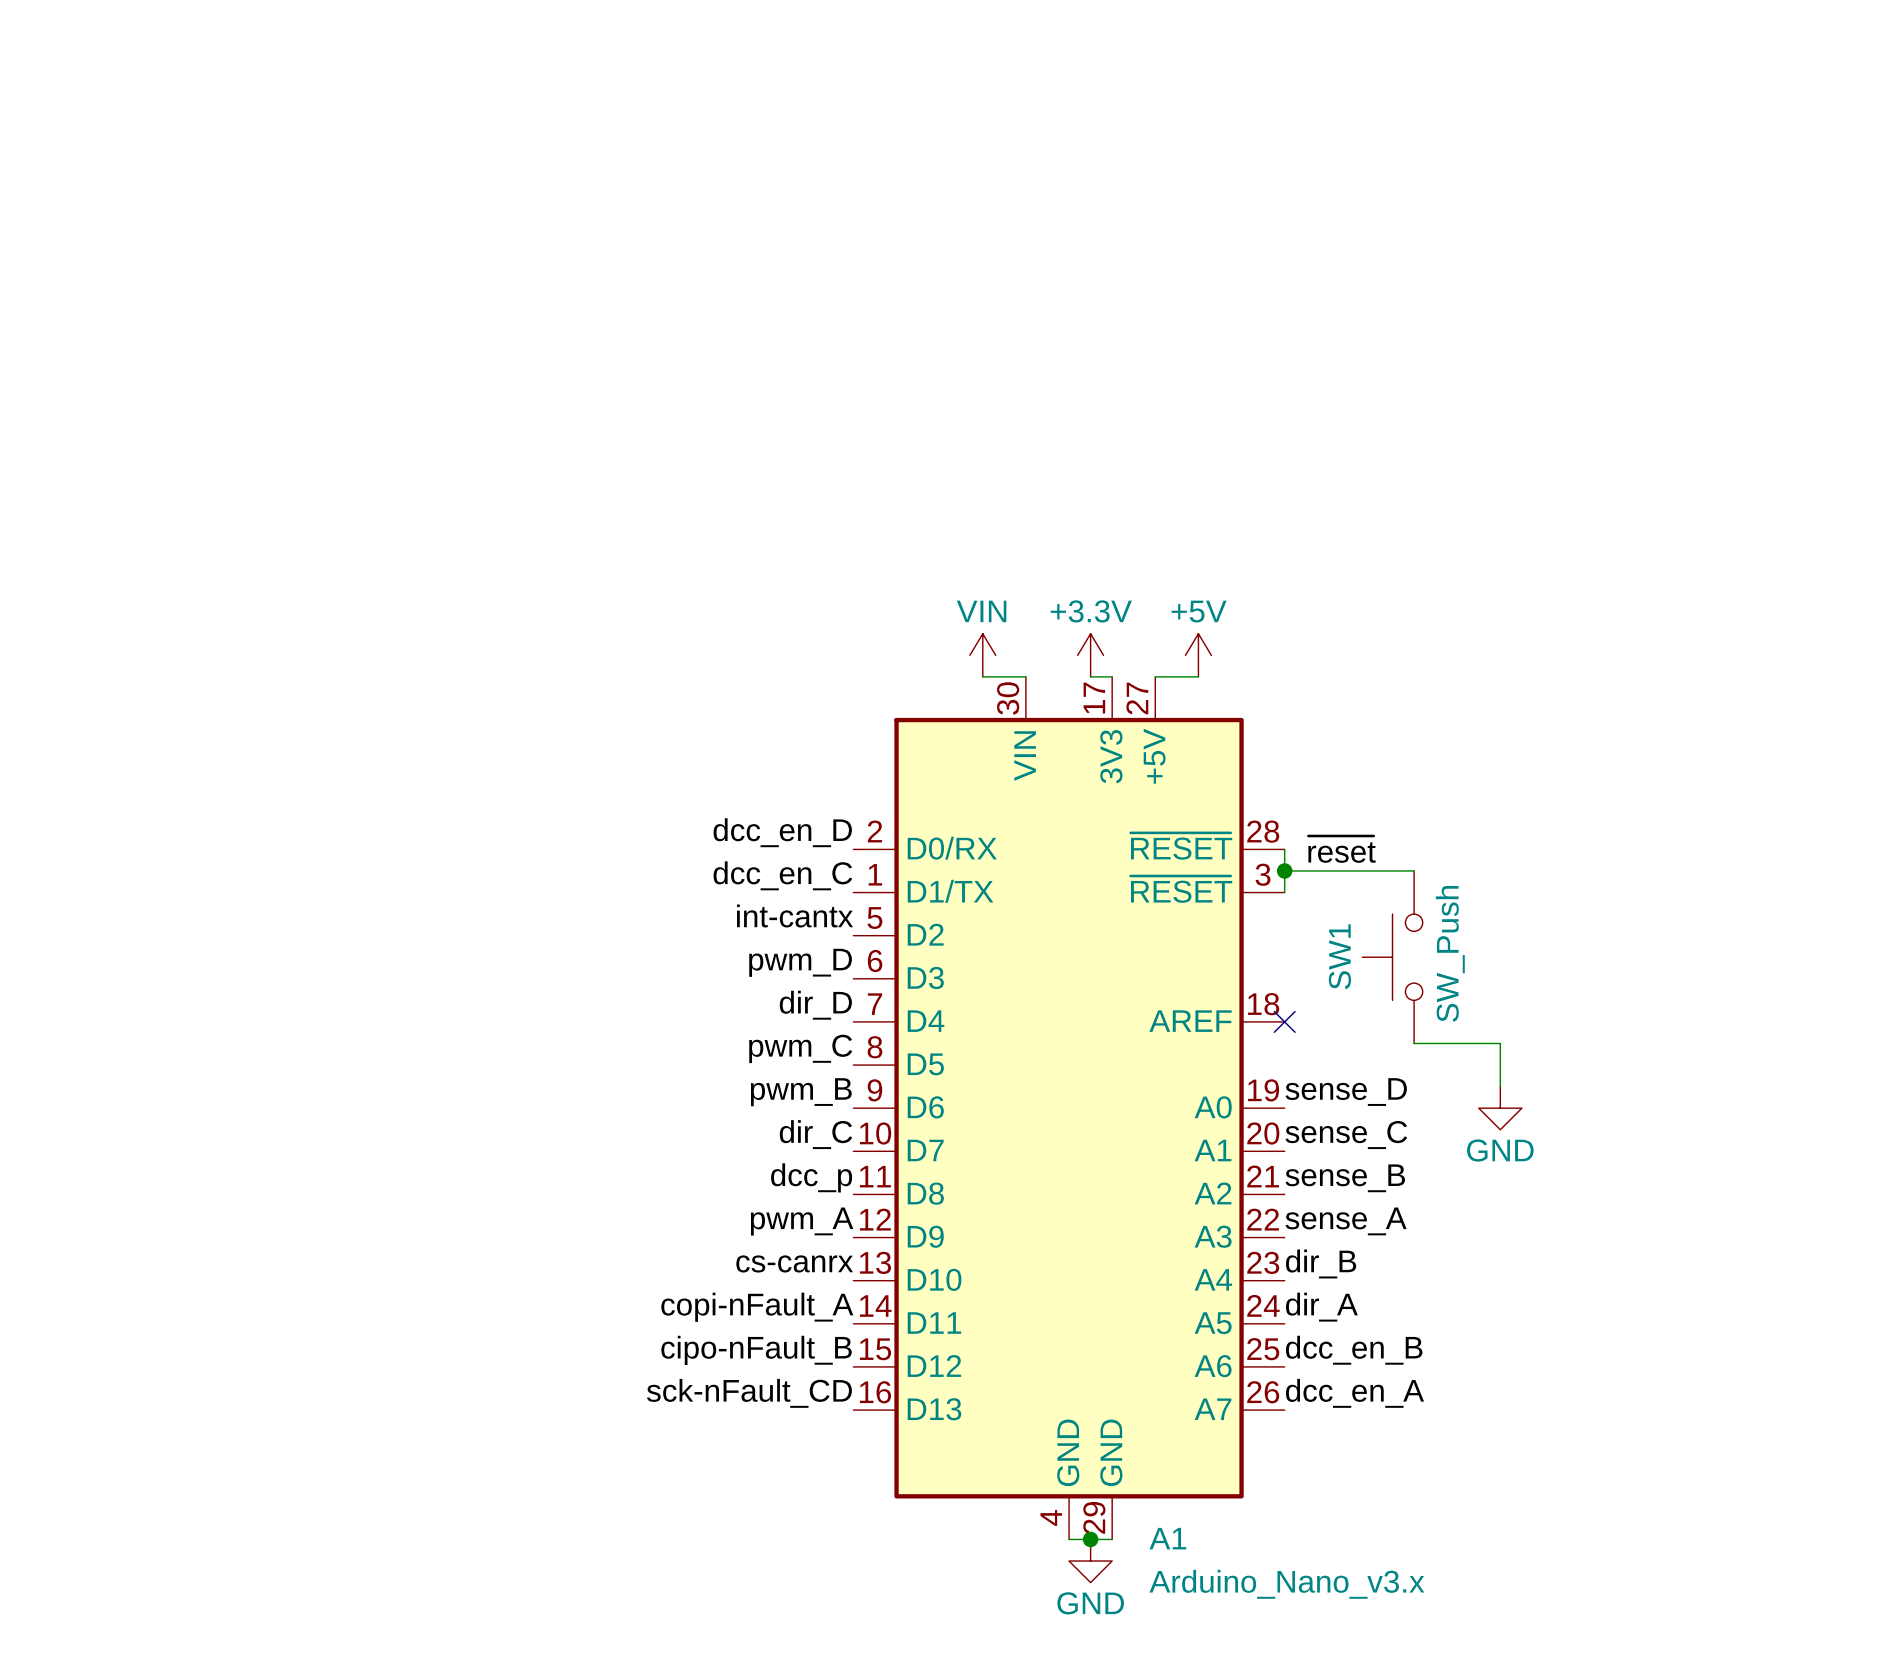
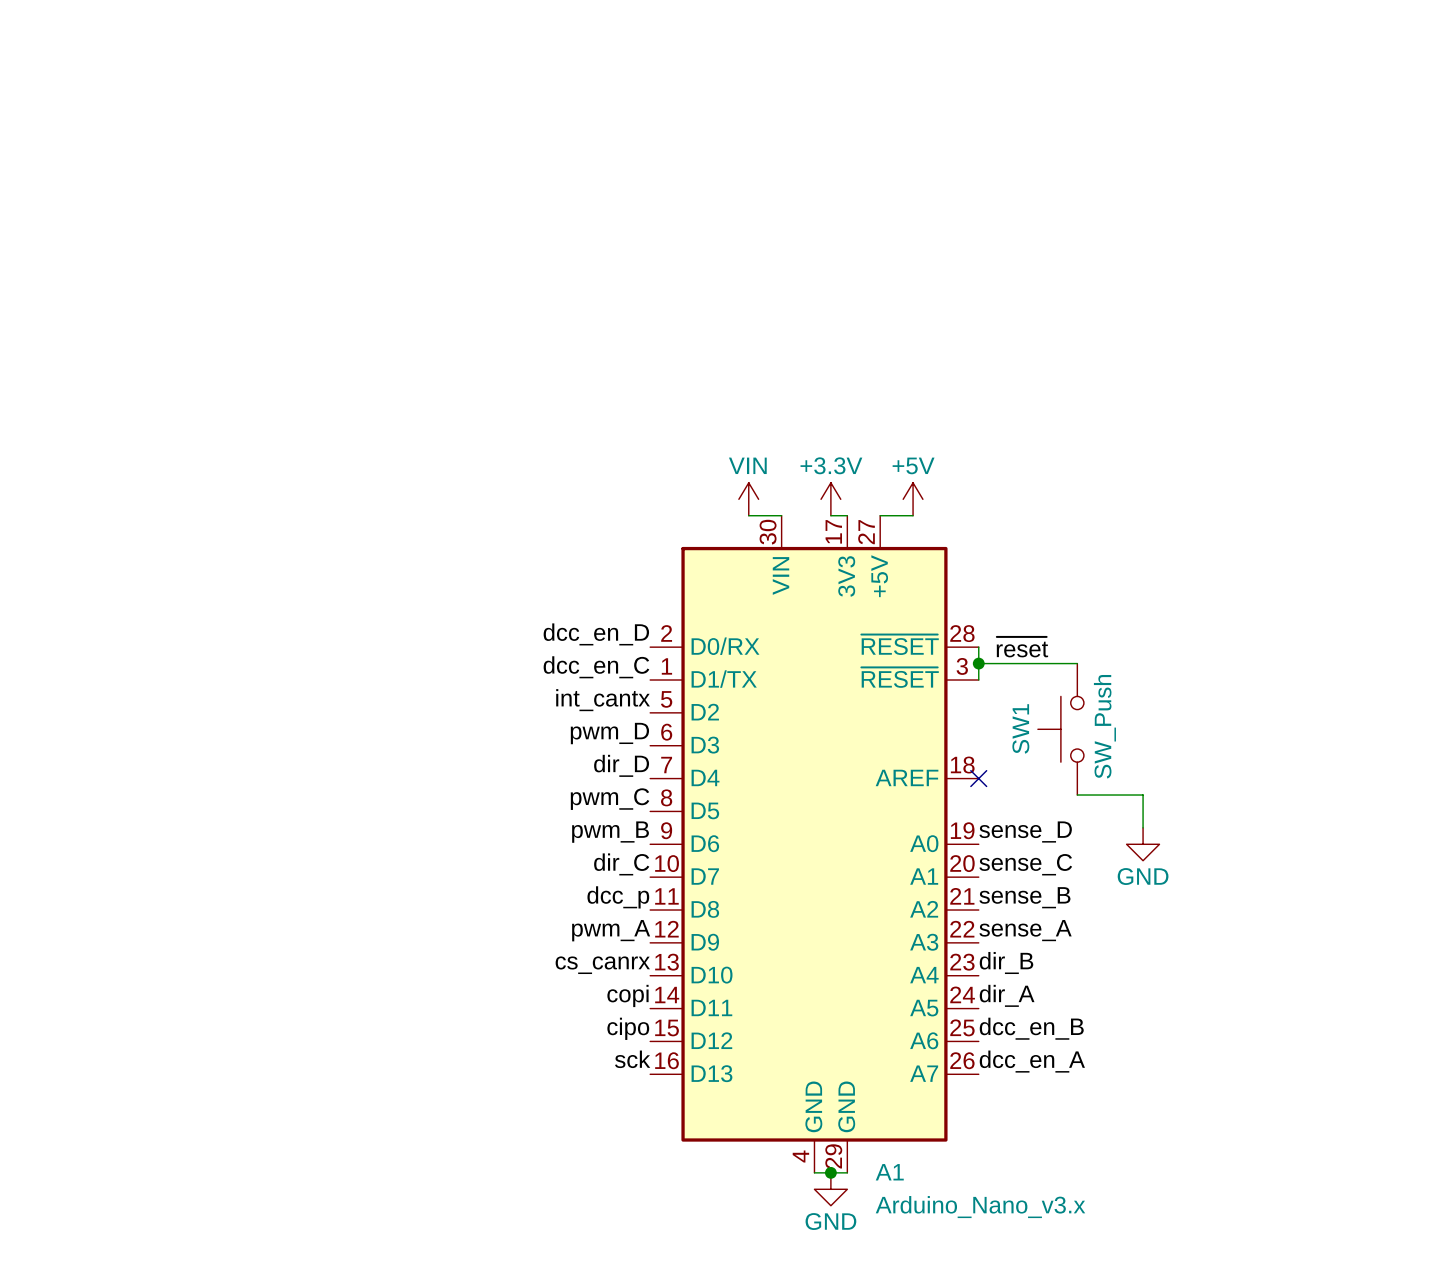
label: int-cantx (795, 916) -> int_cantx (603, 700)
label: cs-canrx (794, 1263) -> cs_canrx (602, 965)
label: copi-nFault_A (757, 1307) -> copi (627, 995)
label: cipo-nFault_B (756, 1350) -> cipo (628, 1028)
label: sck-nFault_CD (749, 1393) -> sck (632, 1059)

